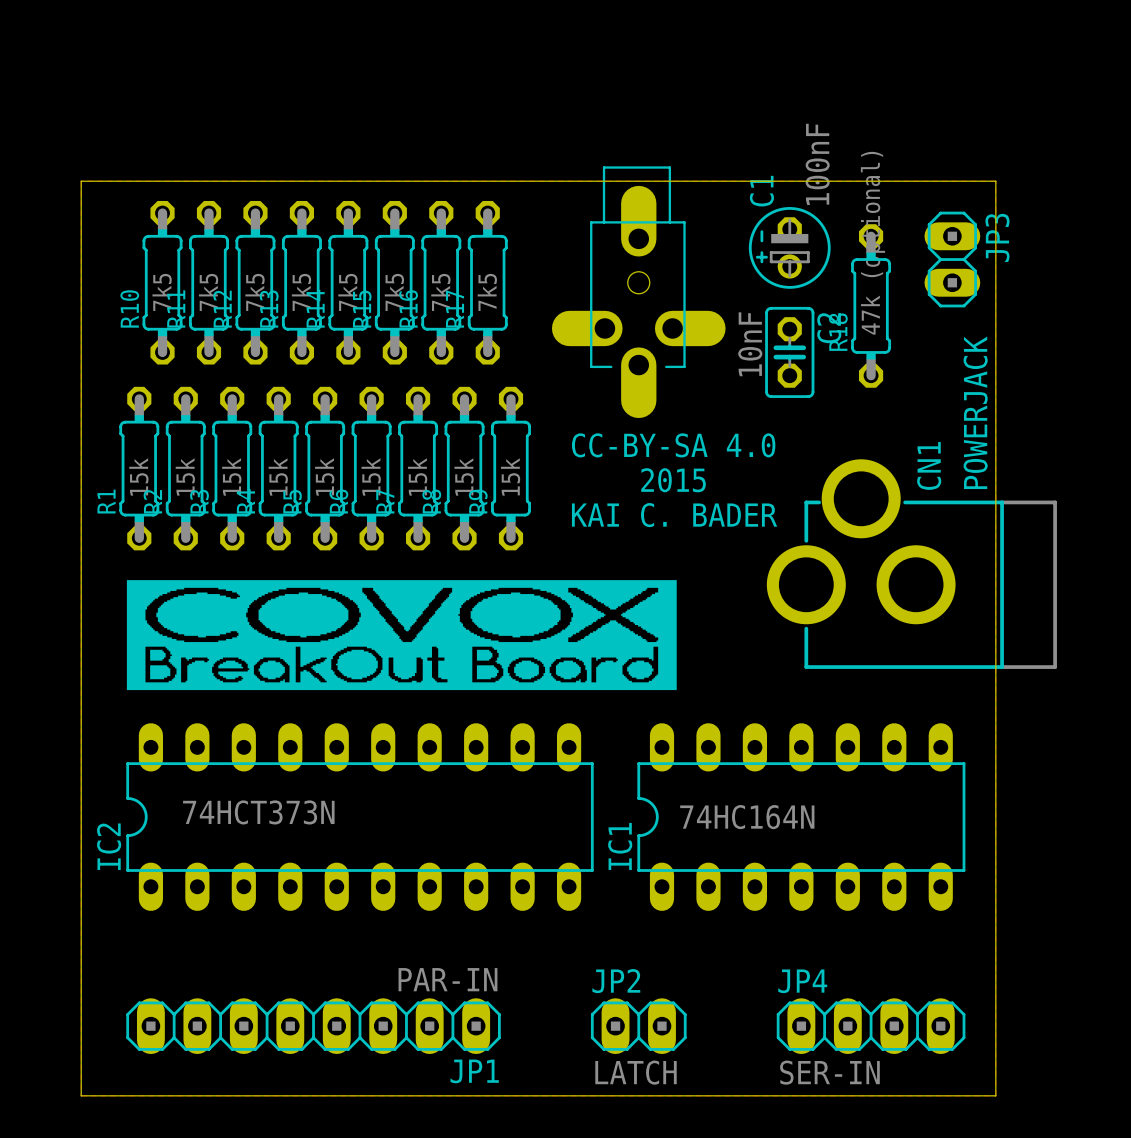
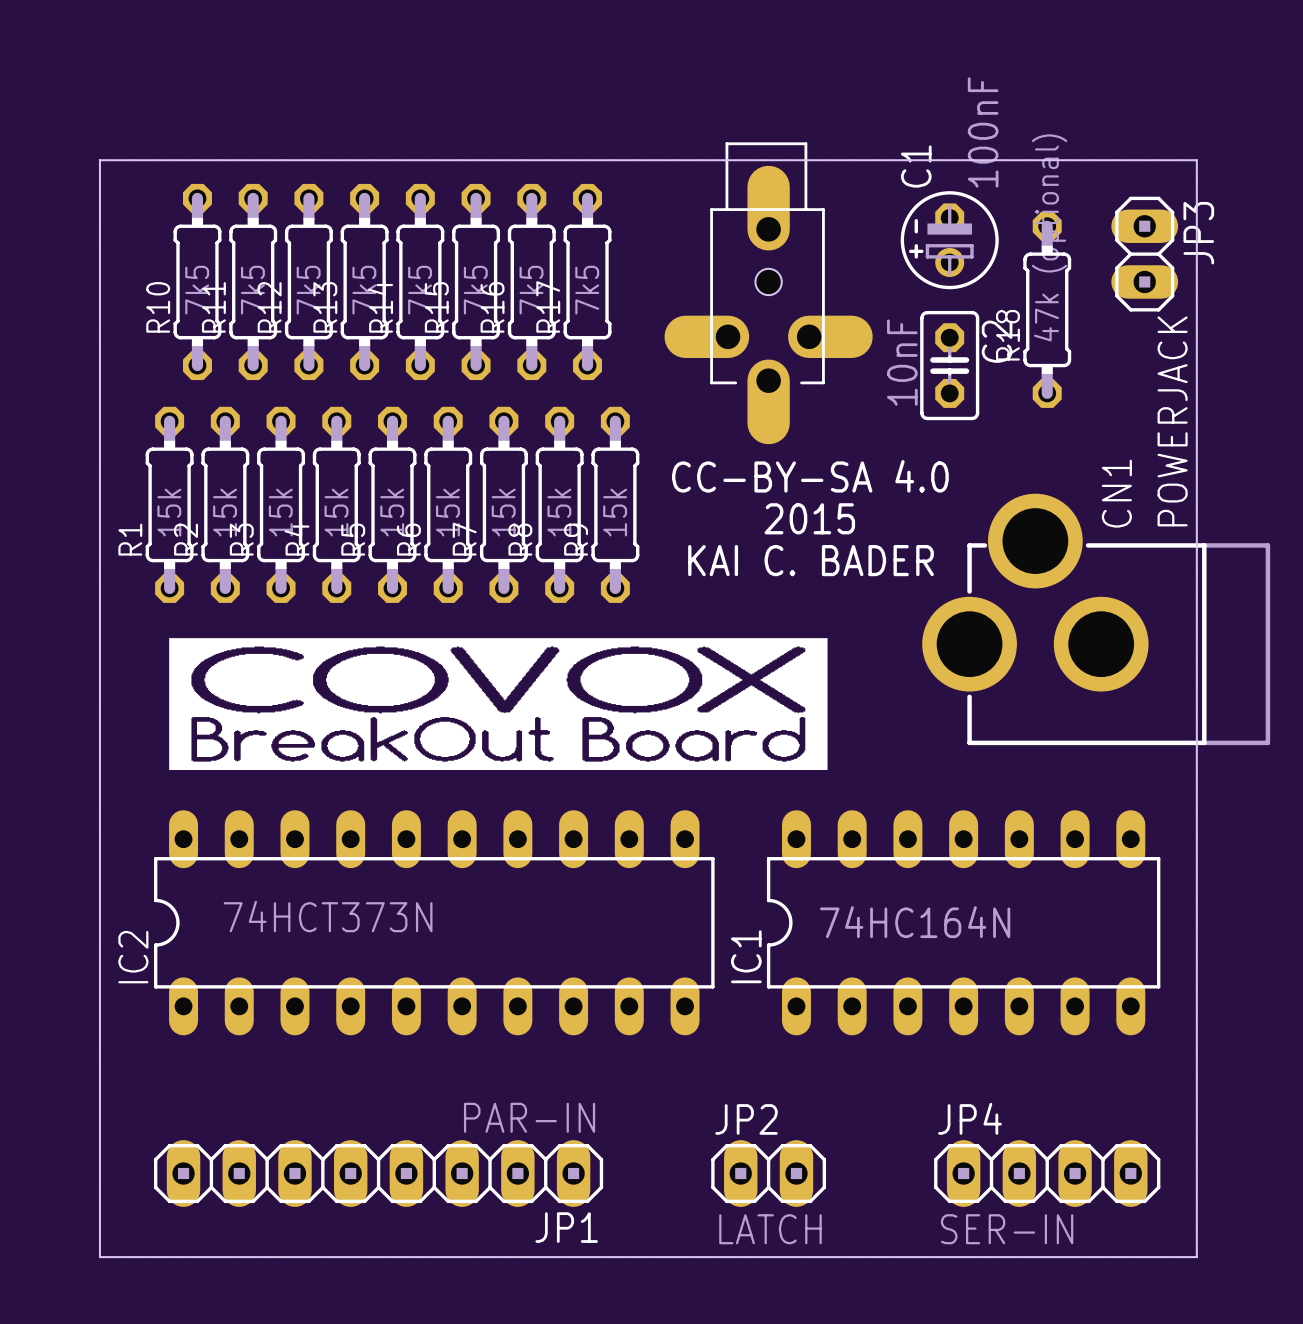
drawing shape: [126, 580, 677, 691] -> [169, 638, 828, 771]

